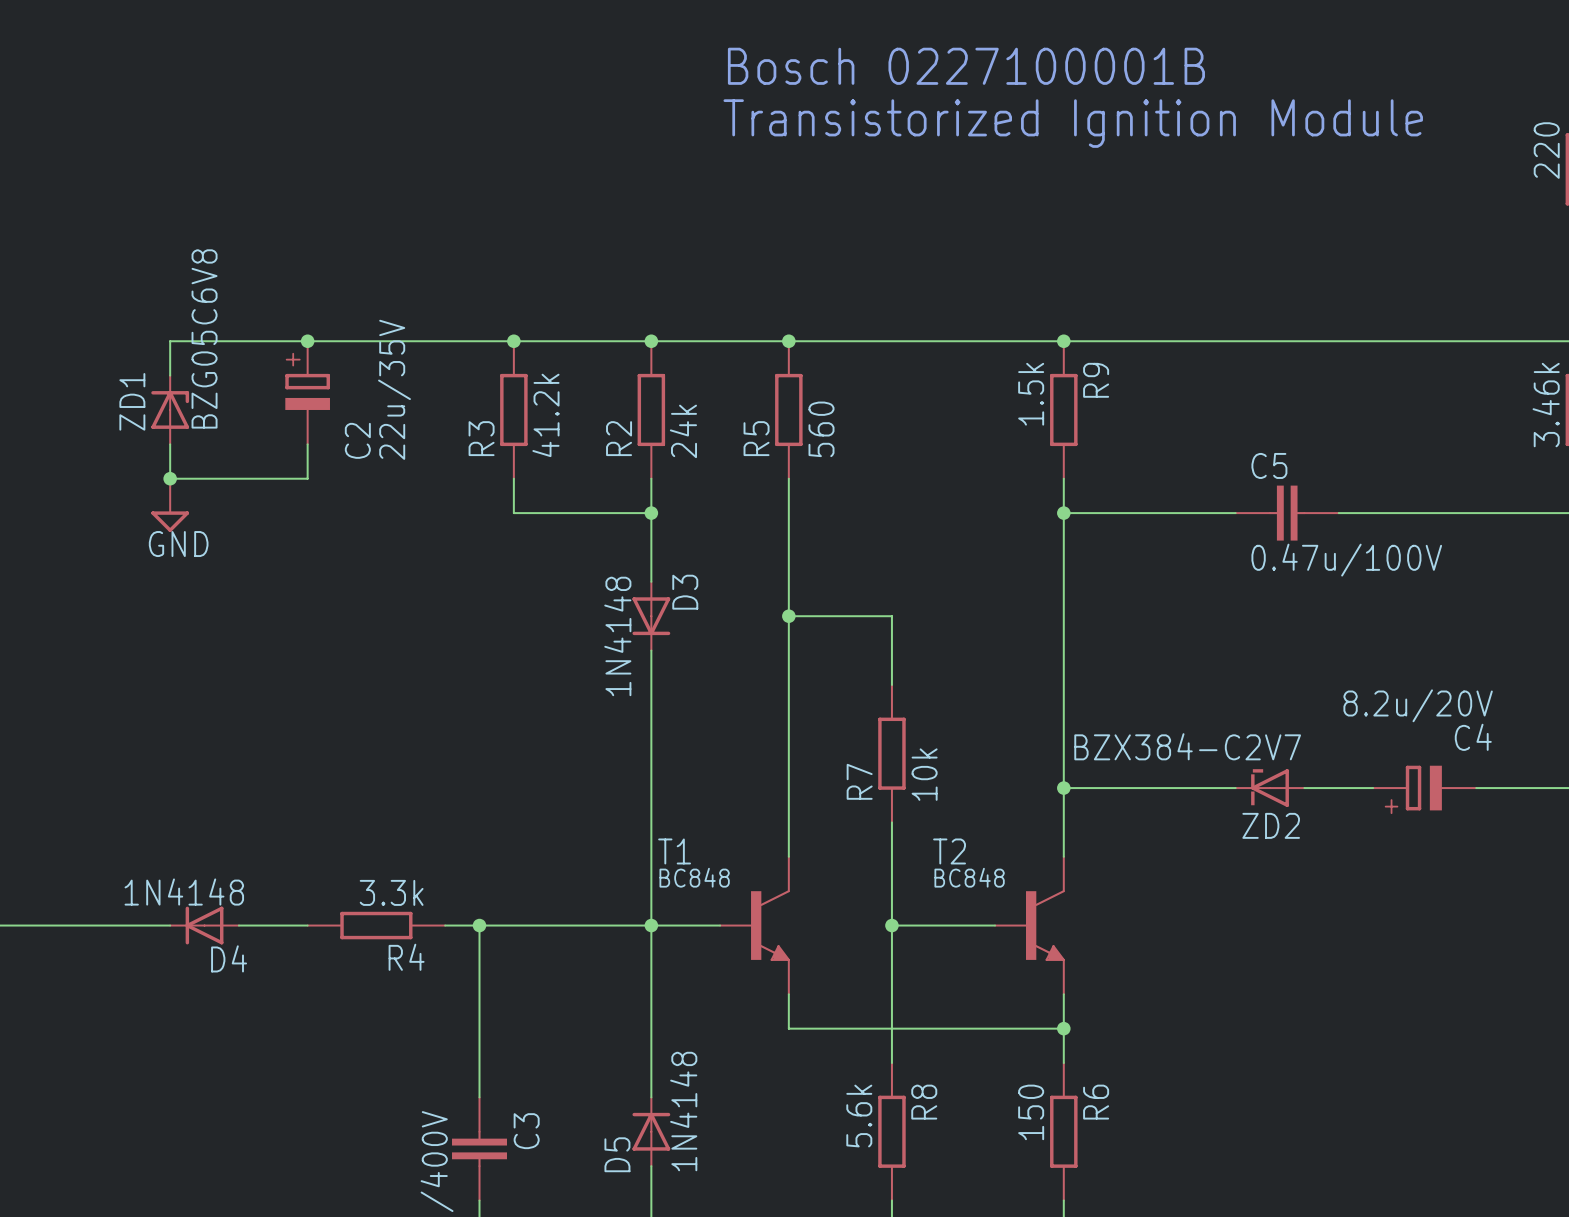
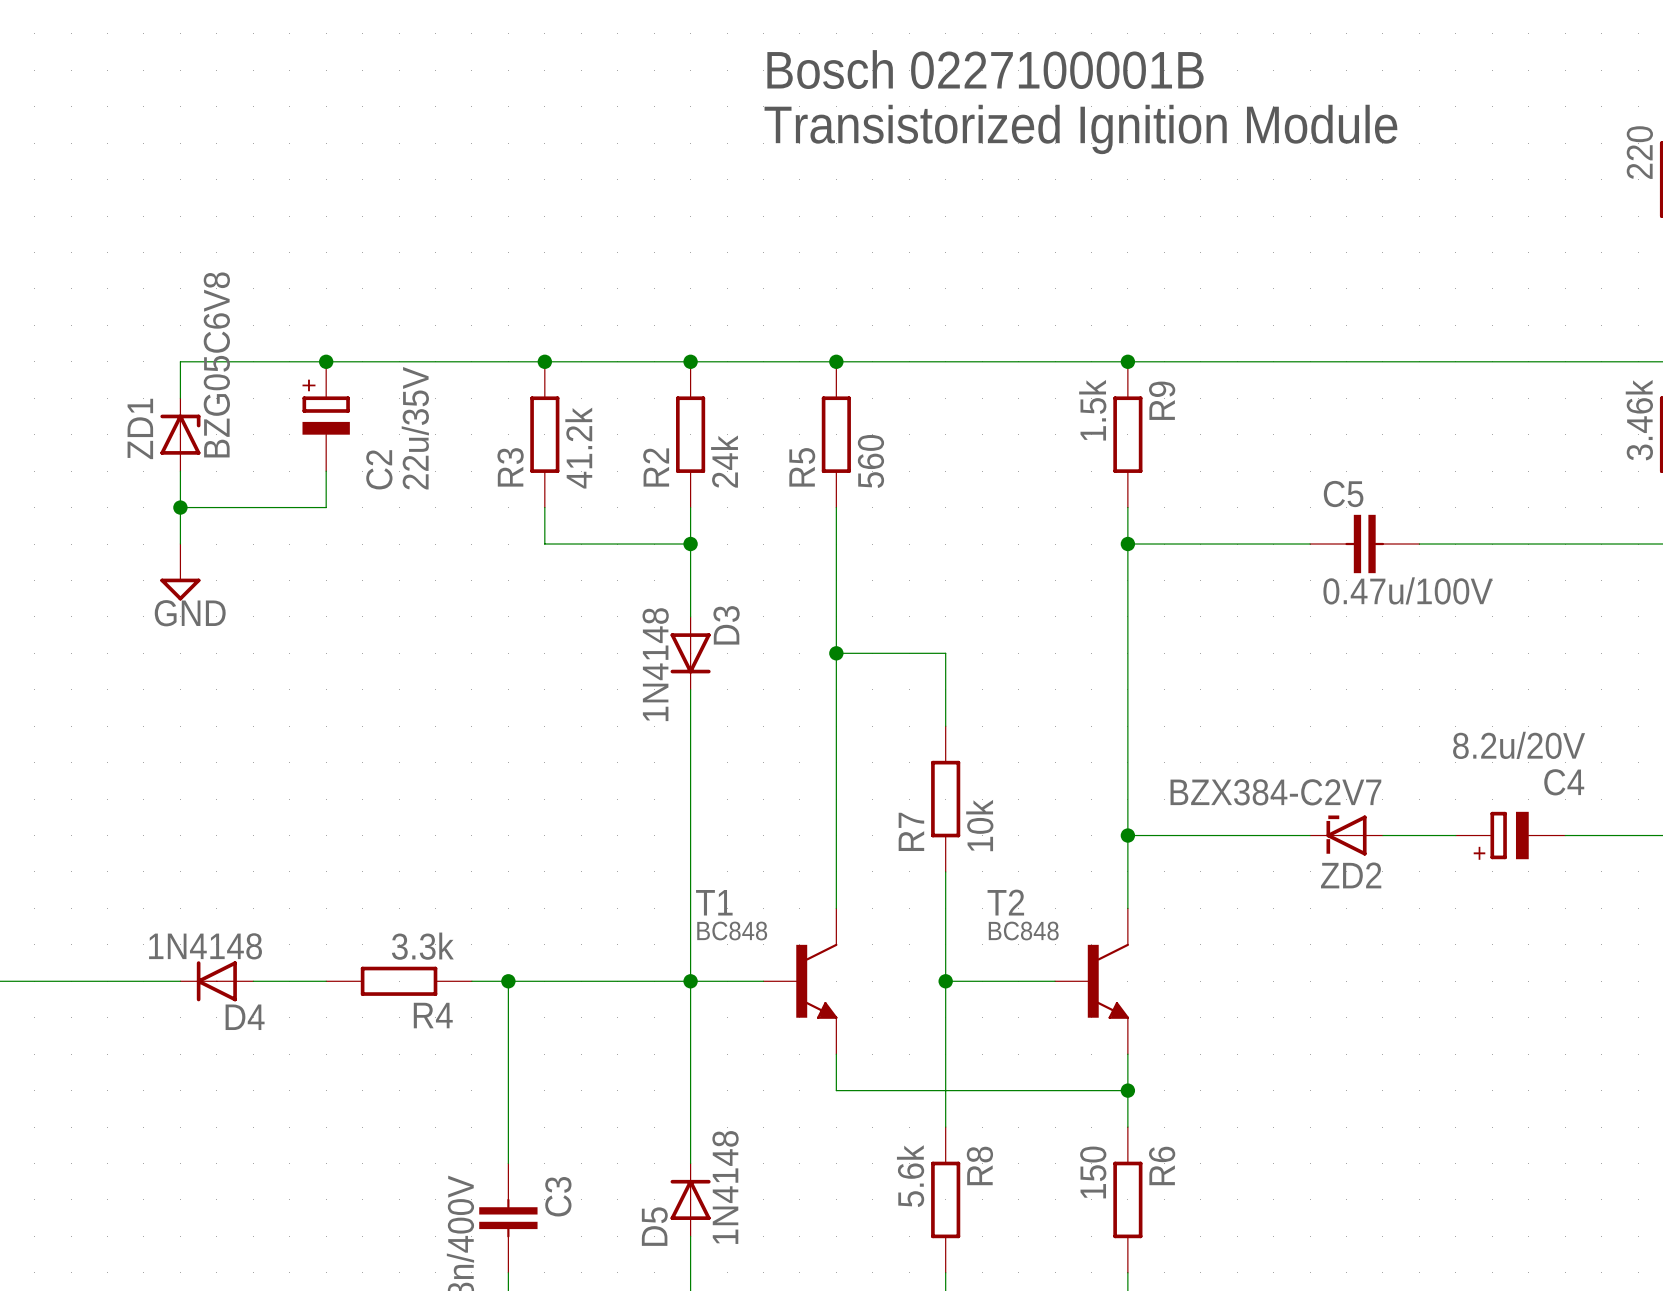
power symbol position: GND (170, 505) -> GND (180, 572)

